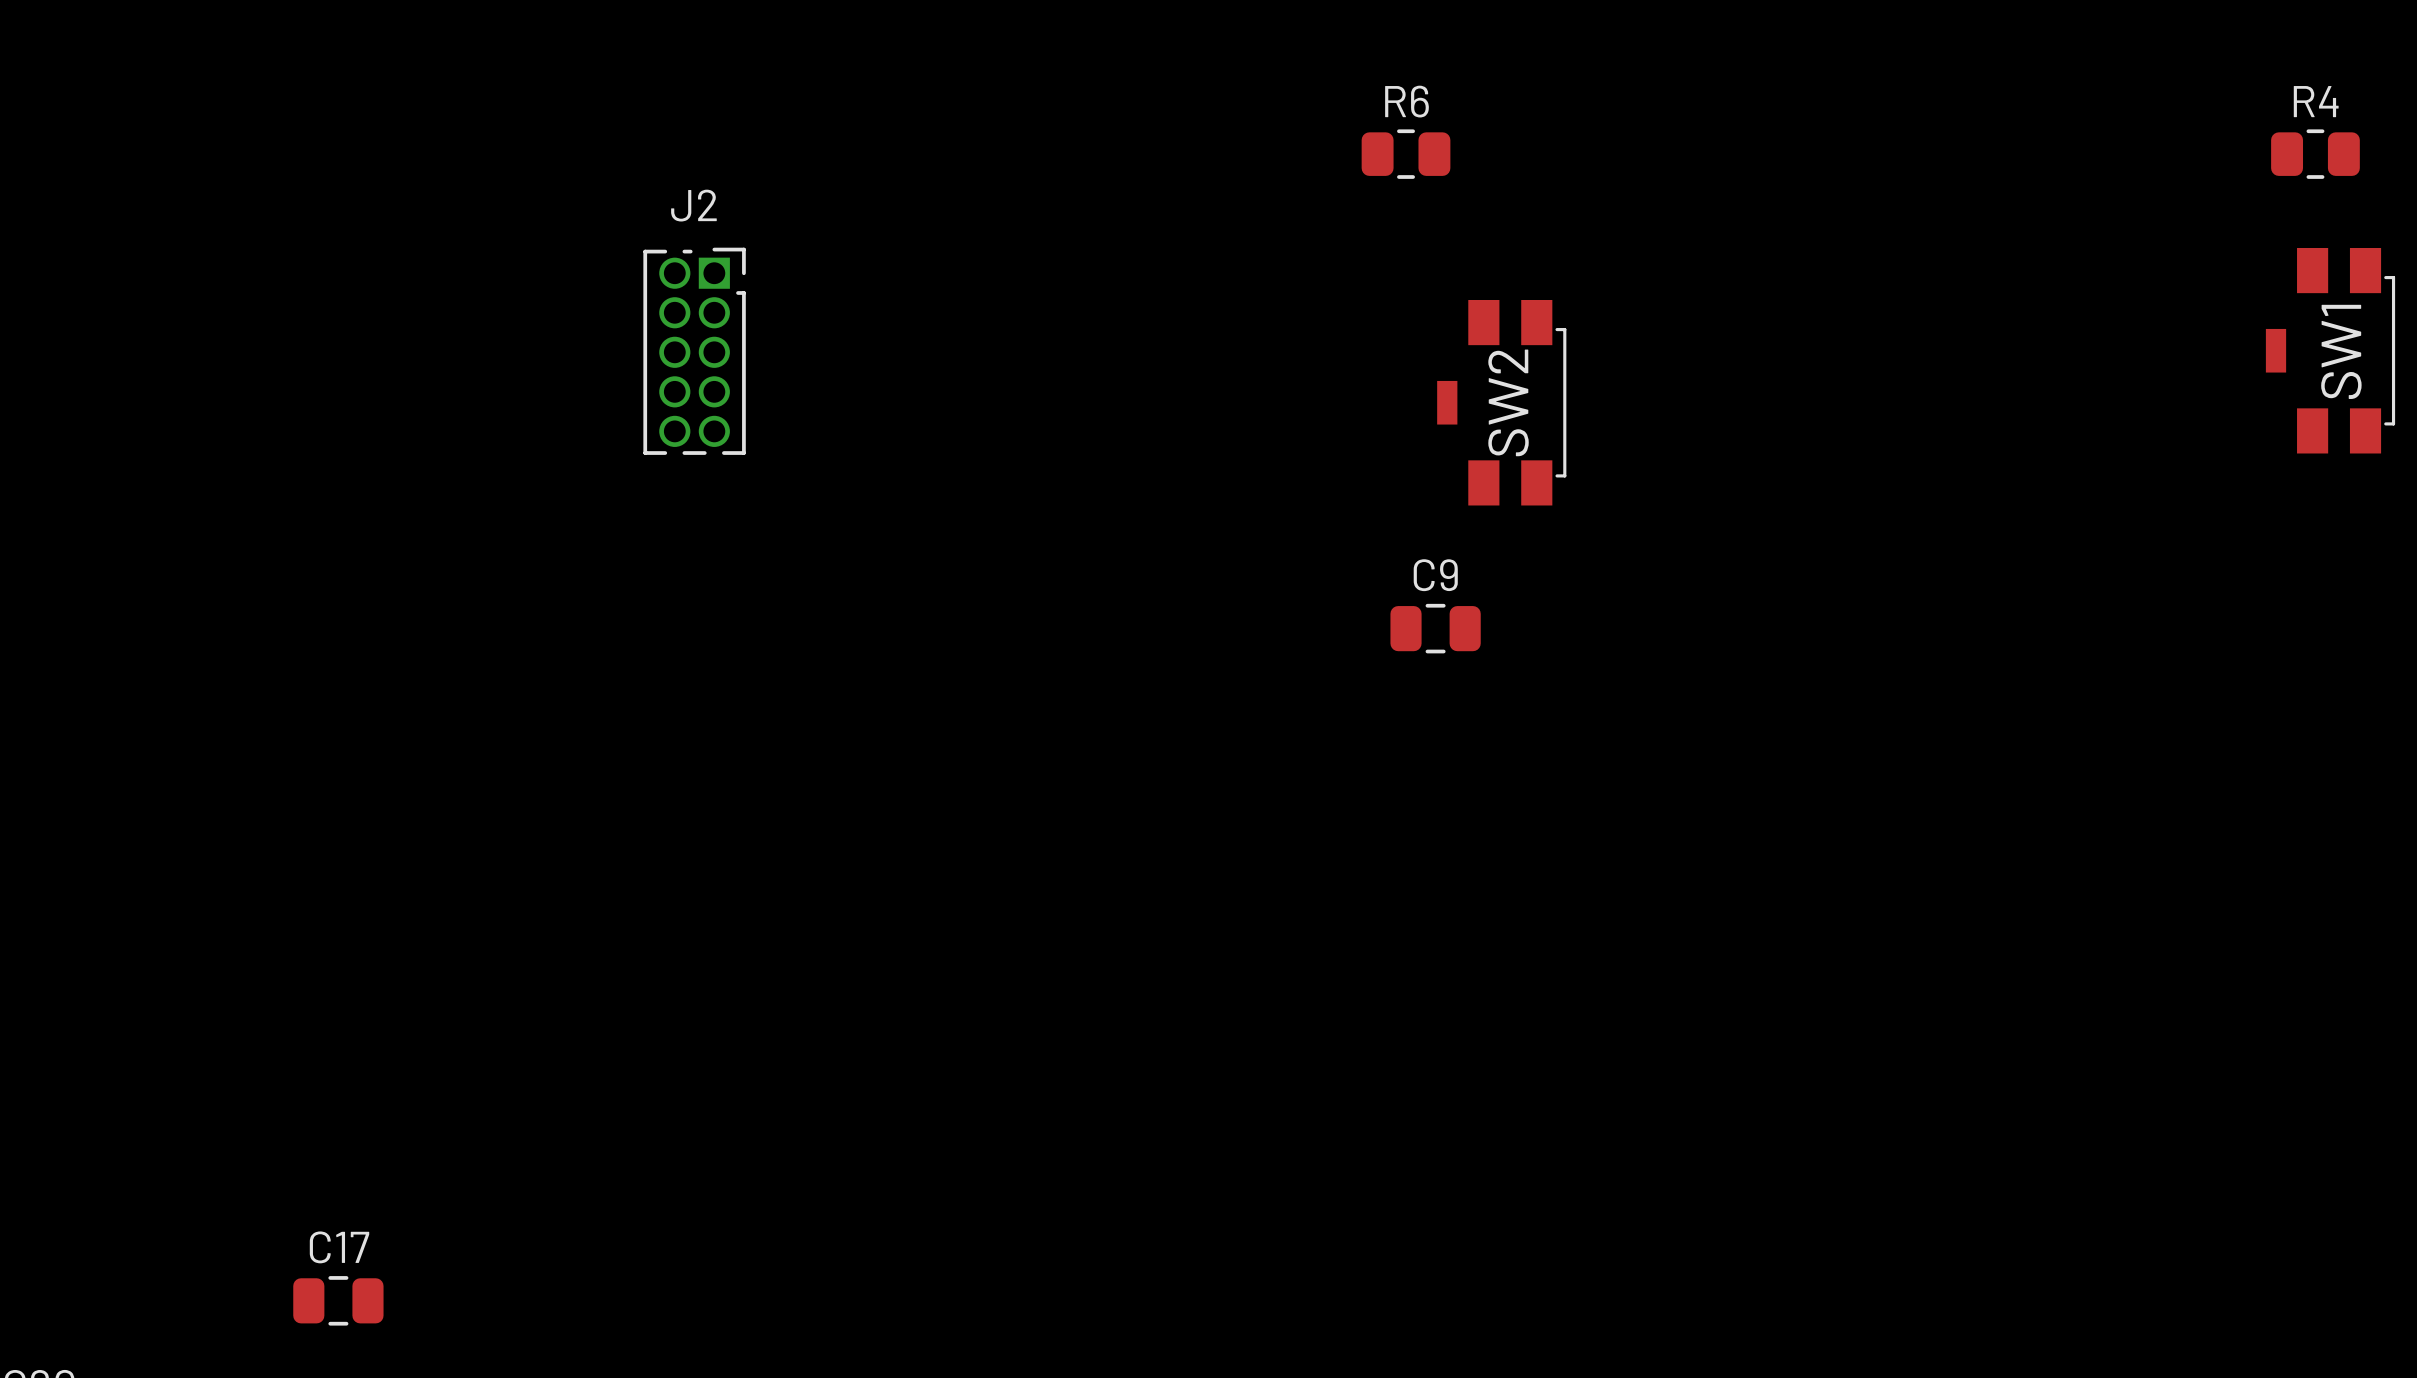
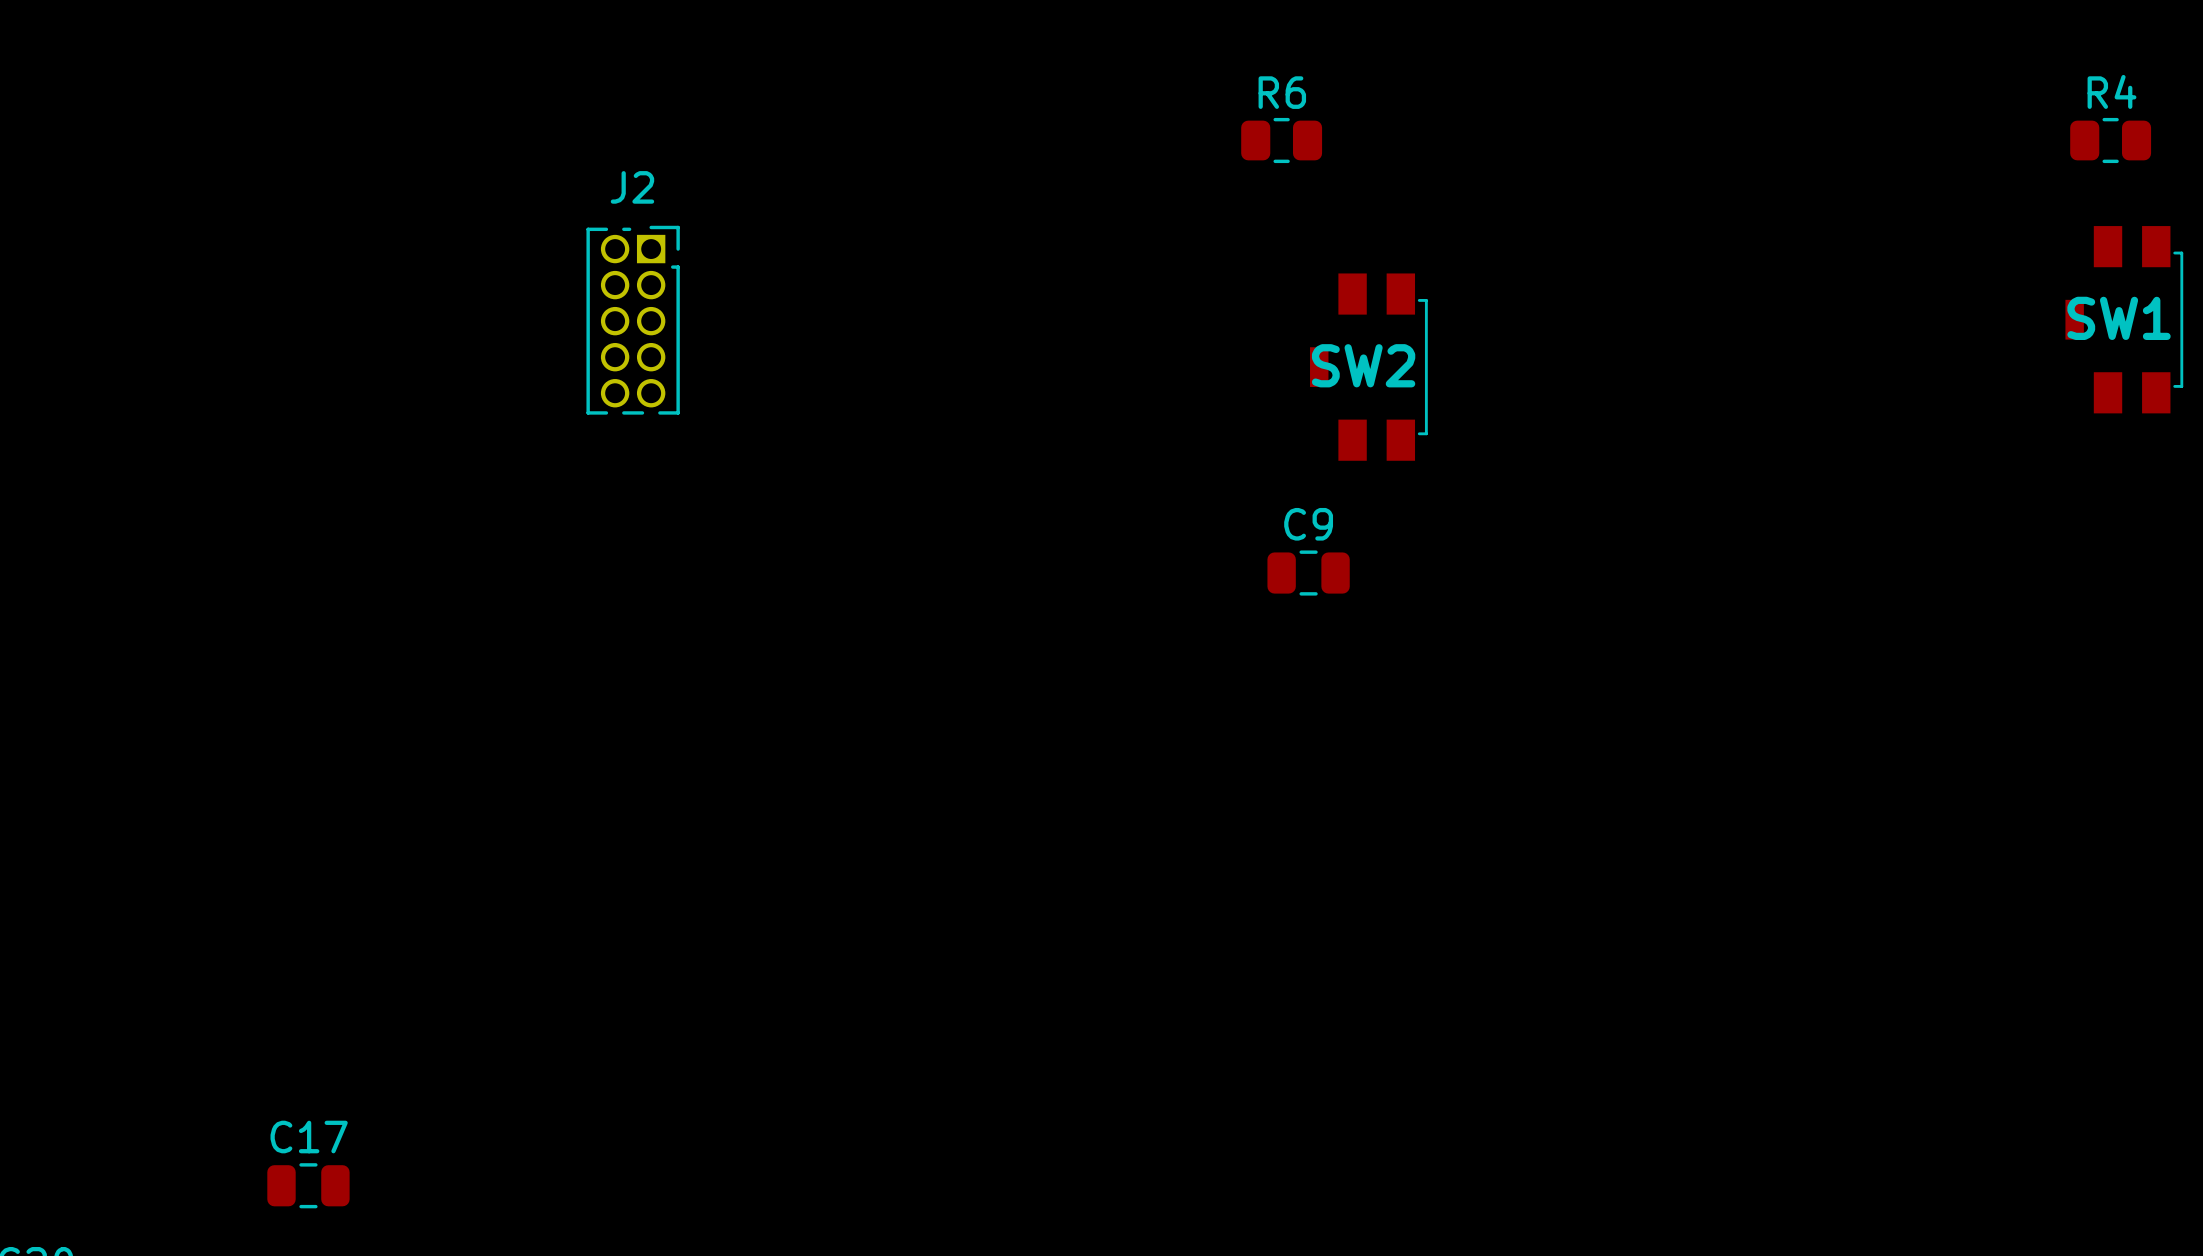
SW1 name rotation: 0° (2341, 351) -> 90° clockwise (2119, 318)
SW2 name rotation: 0° (1508, 402) -> 90° clockwise (1363, 365)

